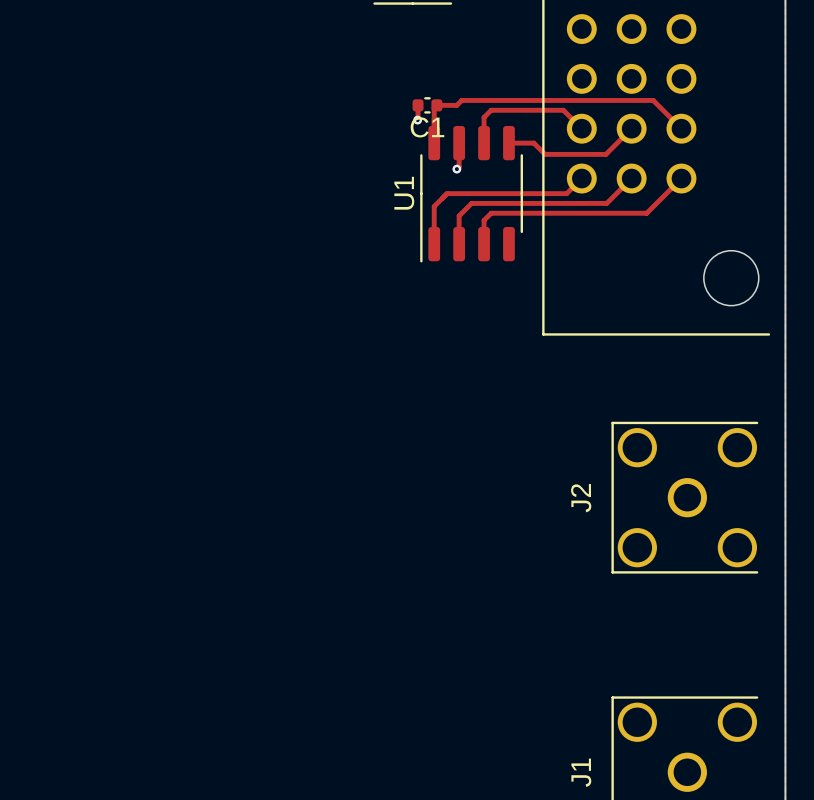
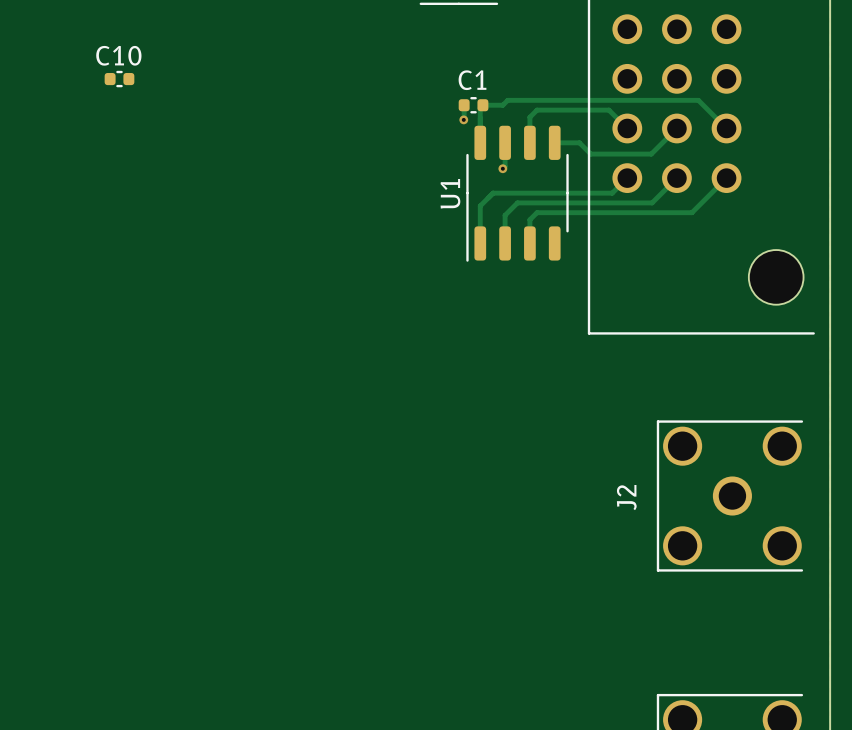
C10: none -> (119, 79)
C1 name position: C1 (427, 127) -> C1 (472, 80)

